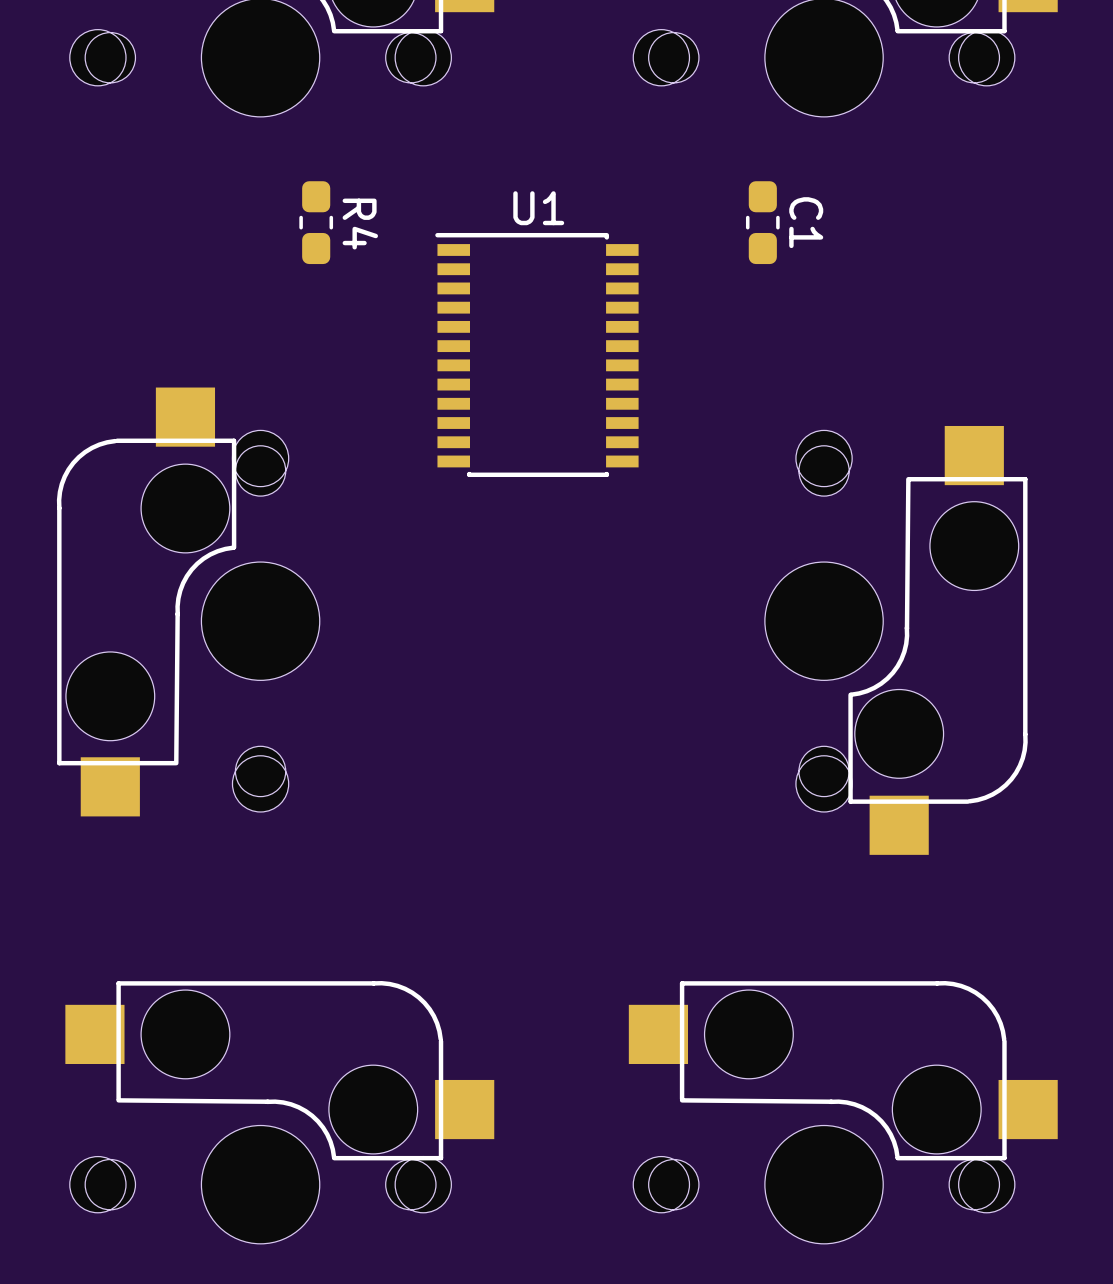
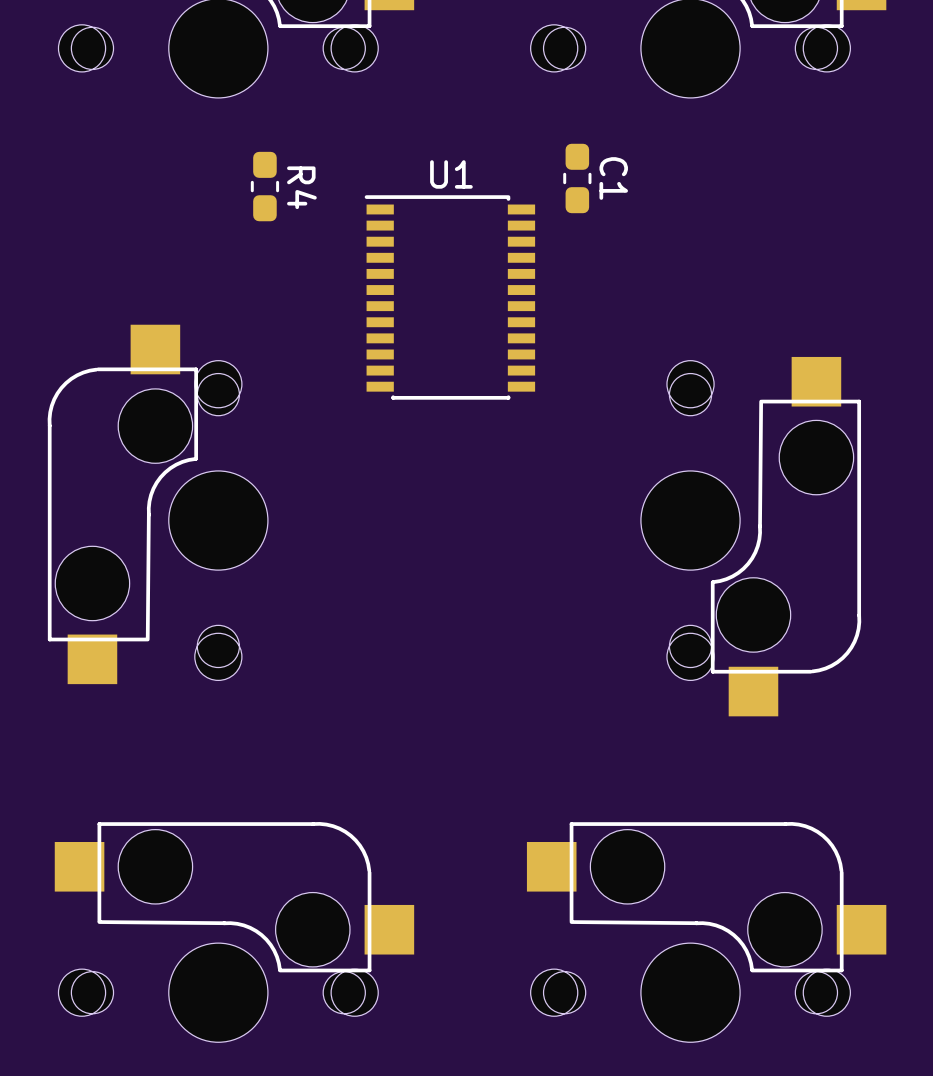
C1 position: (762, 222) -> (577, 178)

